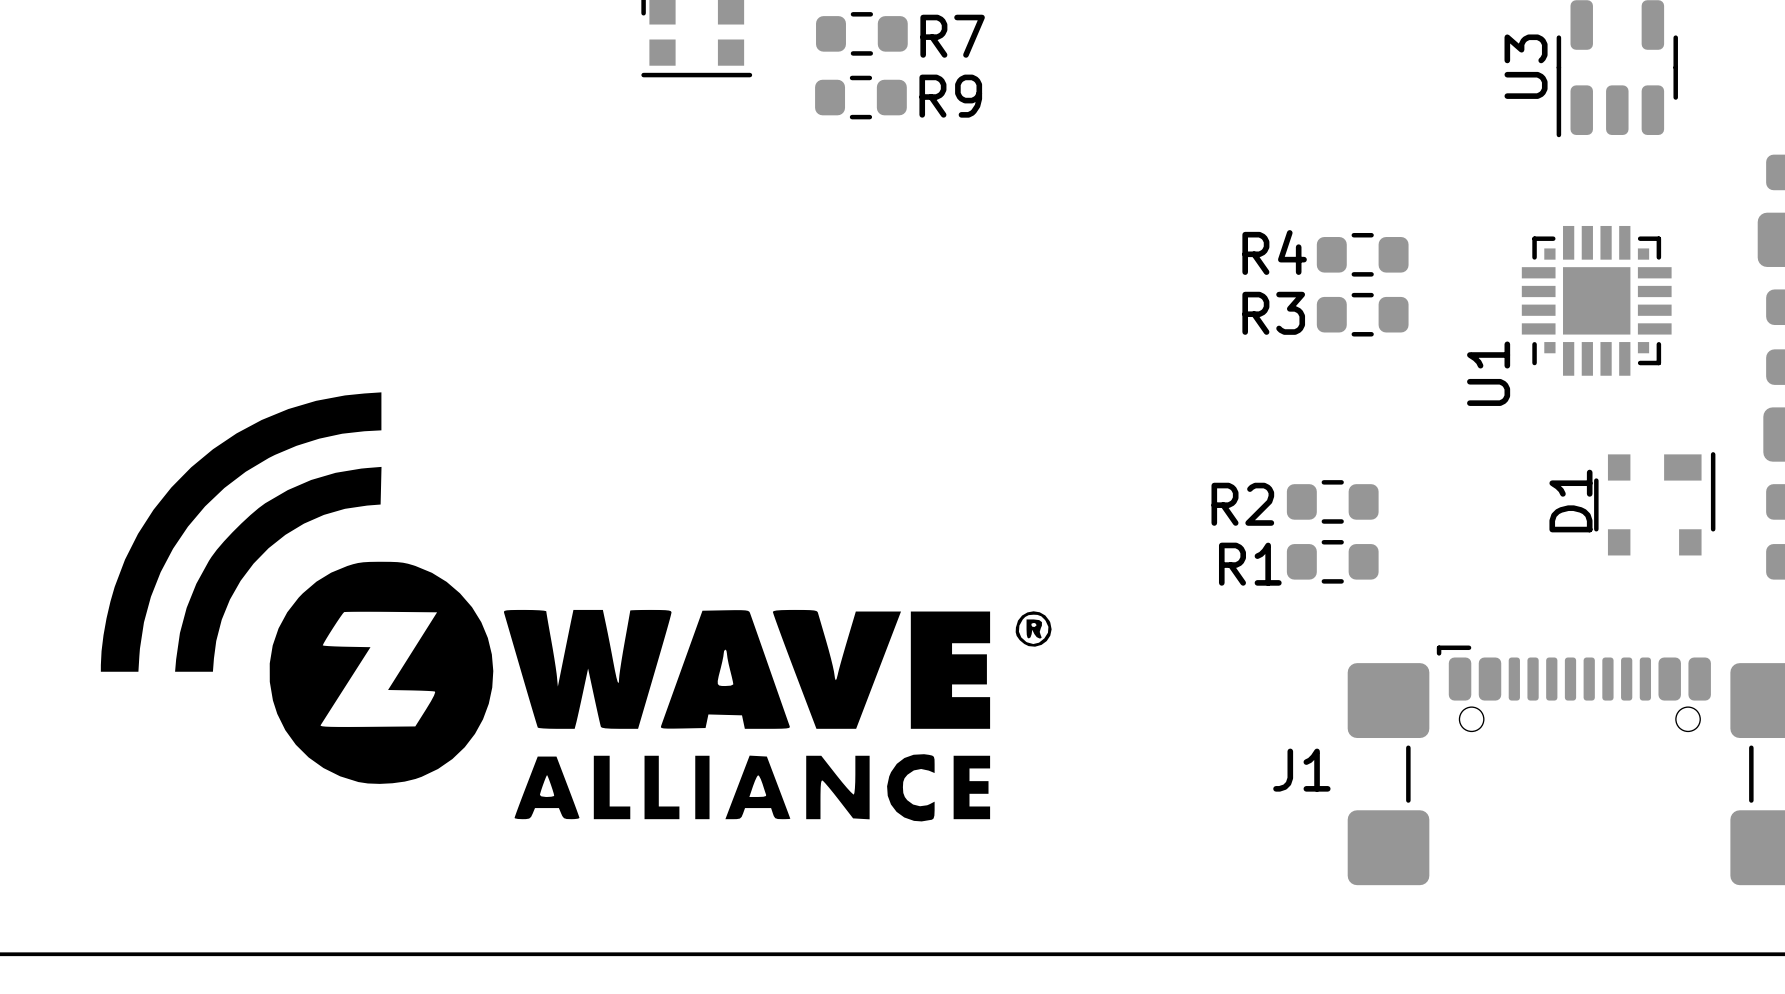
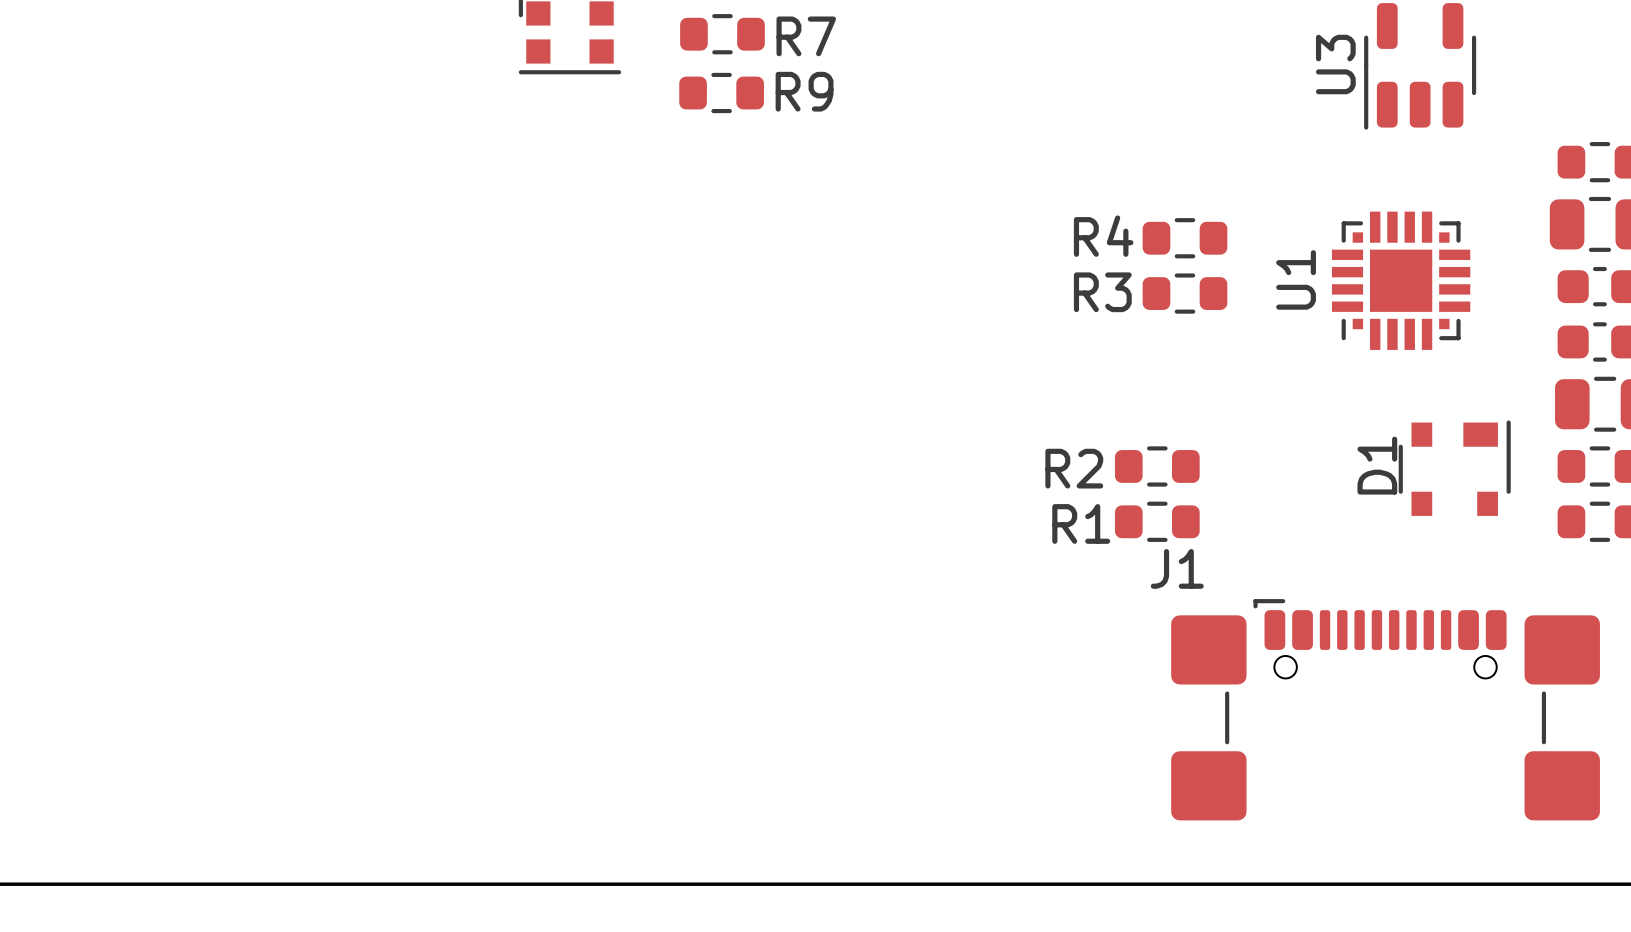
U1 name position: U1 (1488, 373) -> U1 (1296, 279)
drawing: [100, 392, 1052, 822] -> none
J1 name position: J1 (1301, 770) -> J1 (1177, 568)

